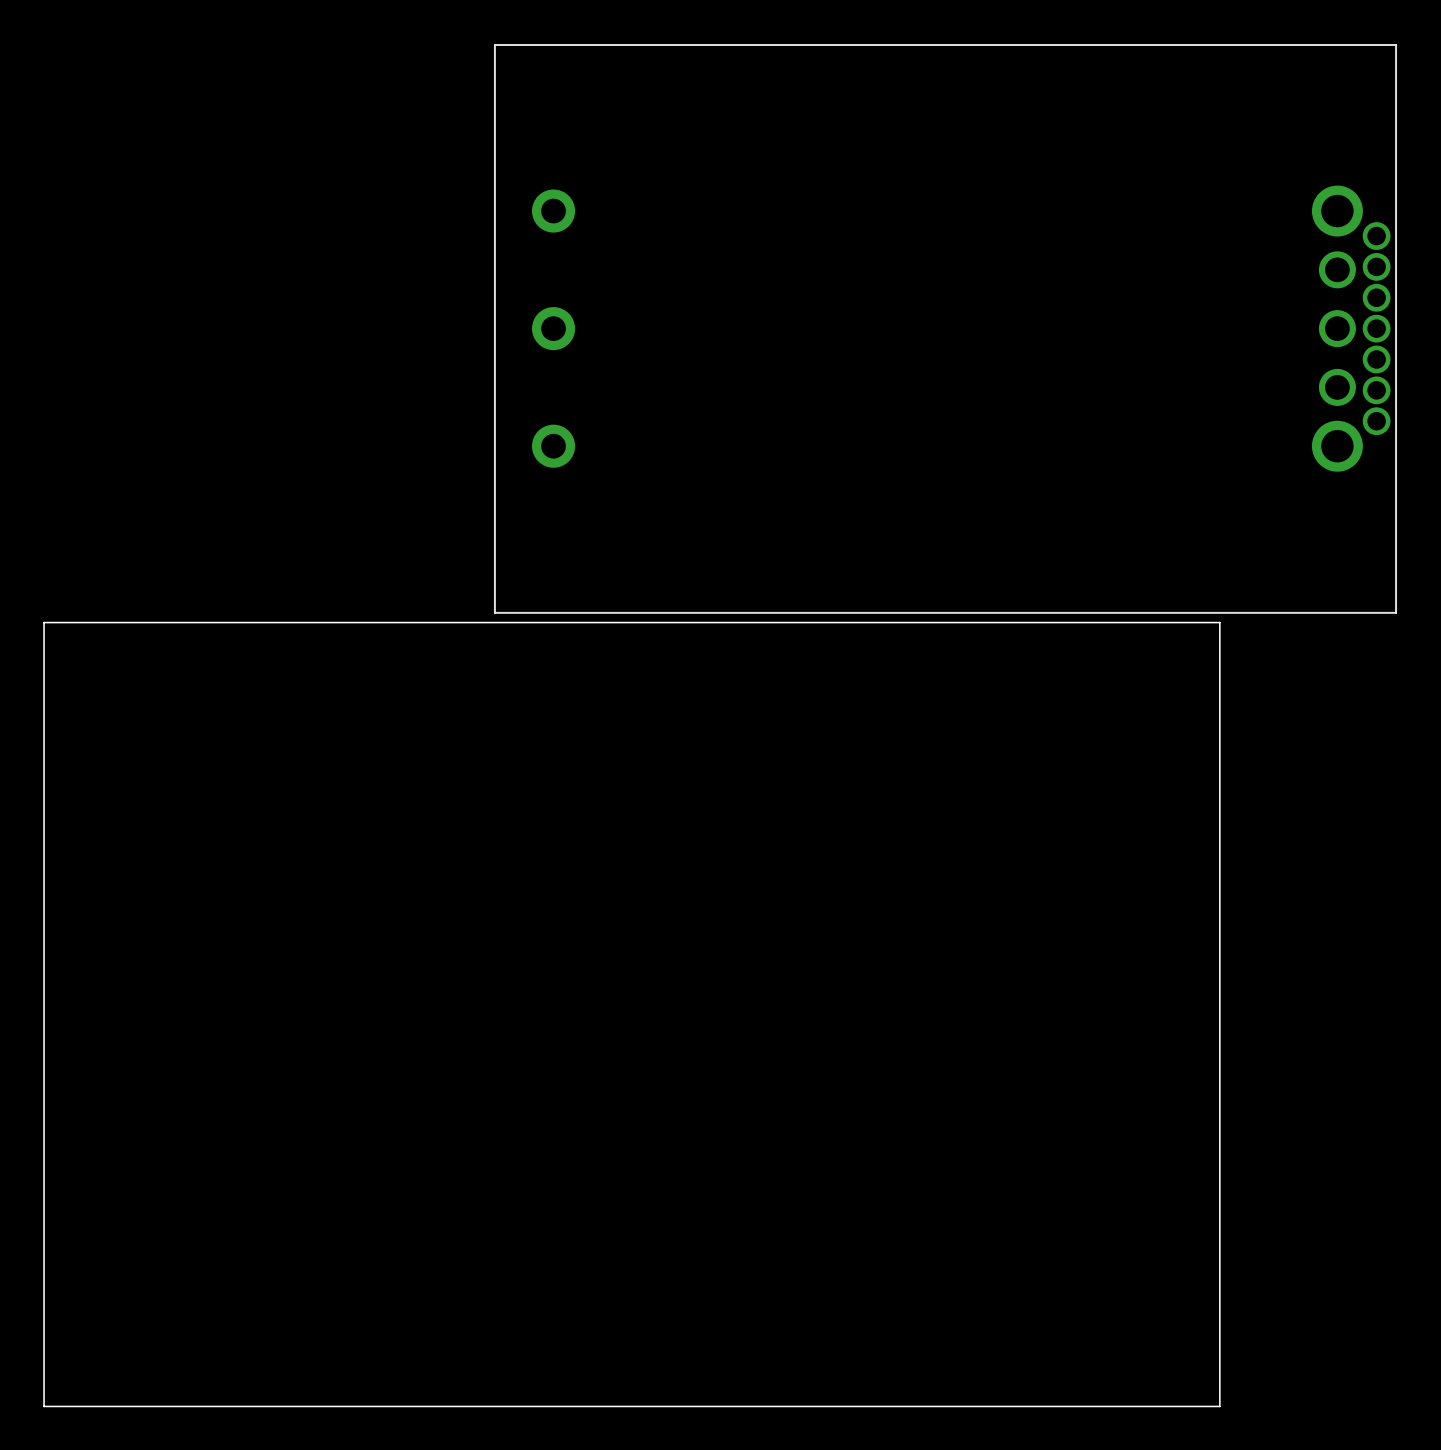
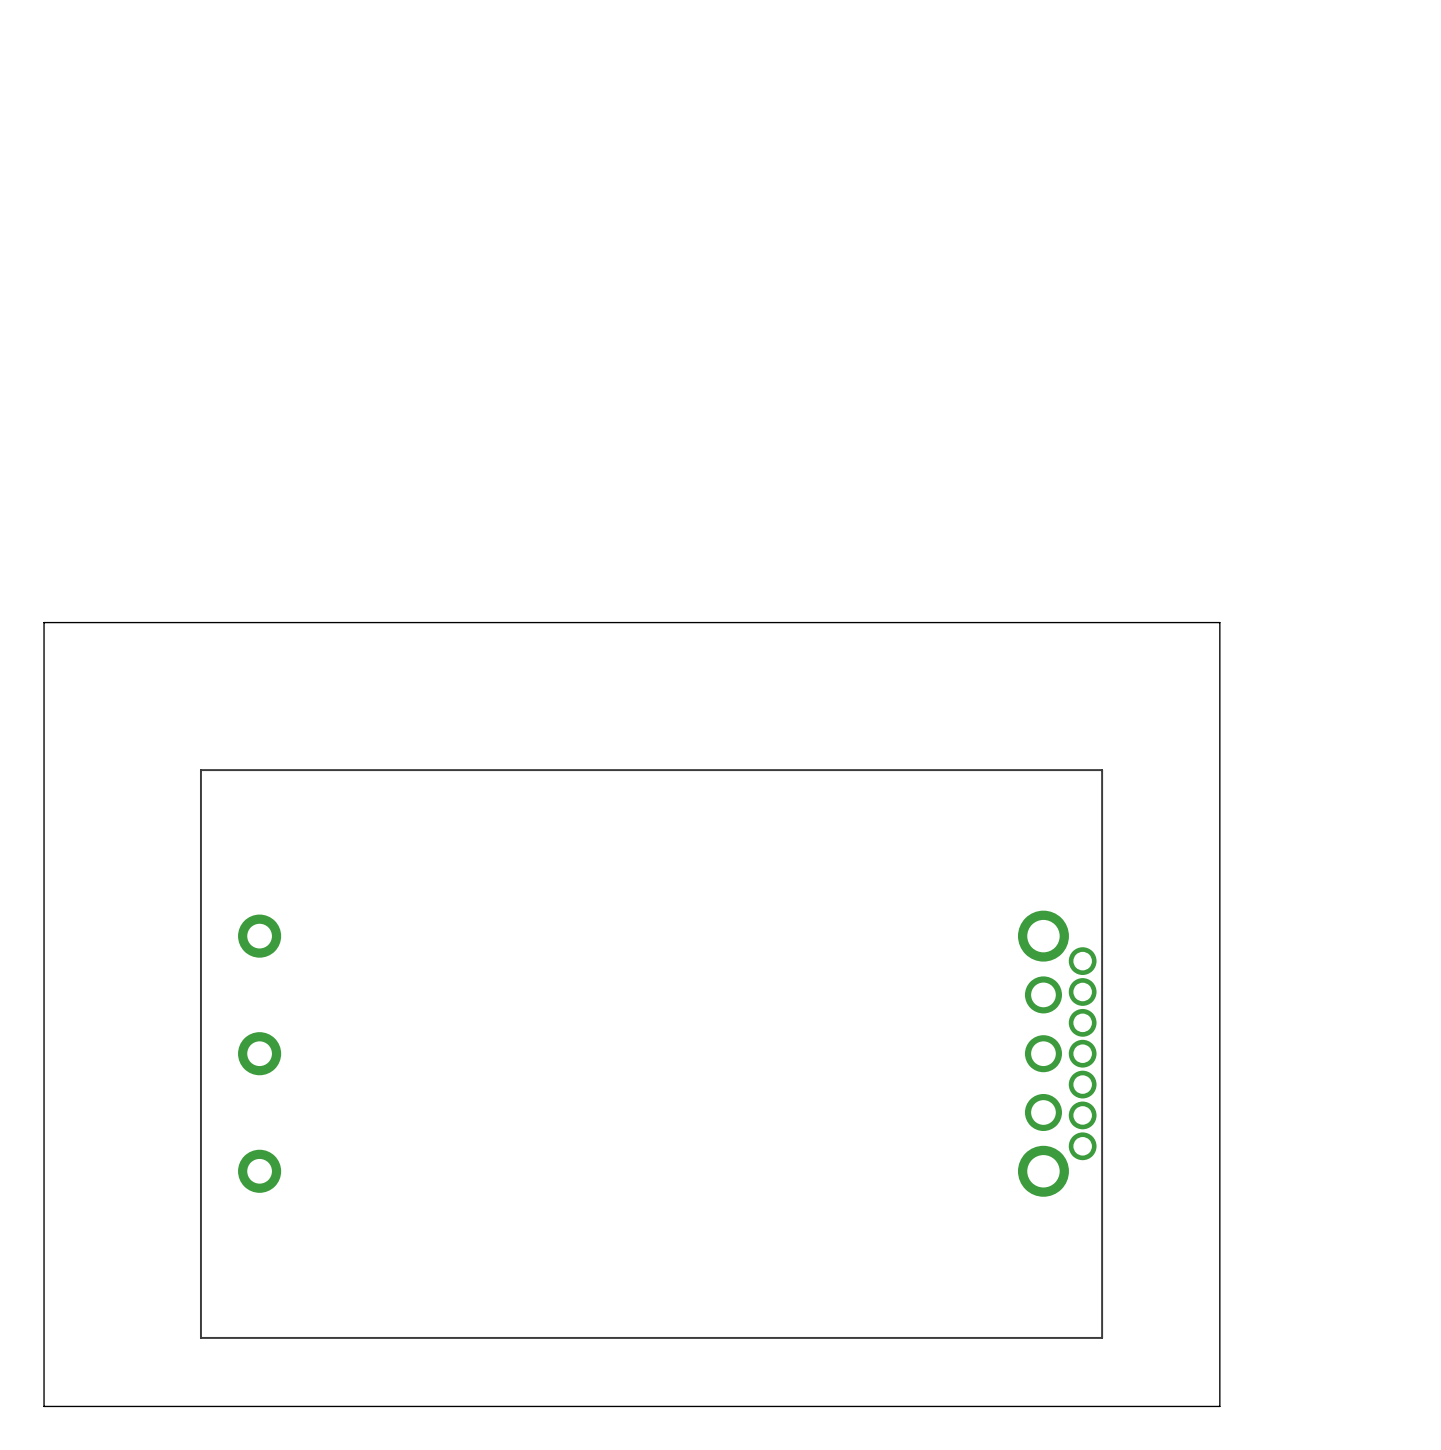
part: (945, 328) -> none
part: none -> (651, 1054)

